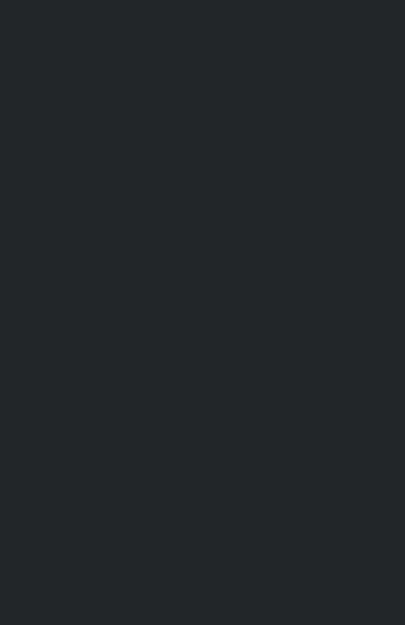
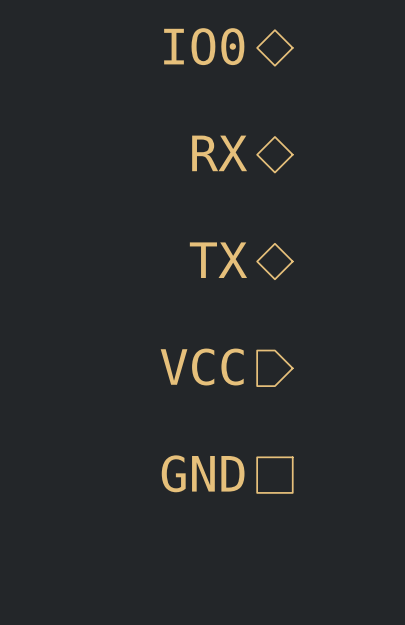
hierarchical label: none -> IO0 (204, 46)
hierarchical label: none -> RX (219, 153)
hierarchical label: none -> TX (218, 260)
hierarchical label: none -> VCC (202, 367)
hierarchical label: none -> GND (203, 473)

